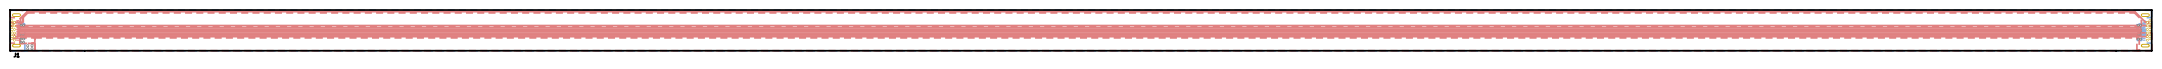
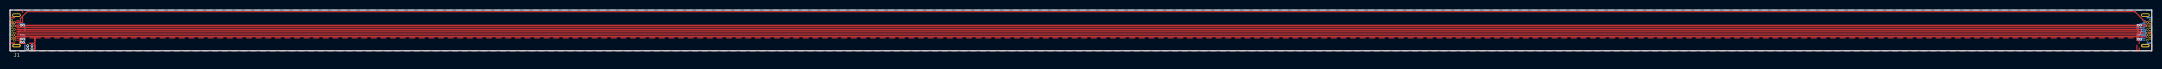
top zone outline: (27, 12) (23, 17) (20, 26) (2141, 26) (2141, 19) (2134, 12) (27, 12) -> none

